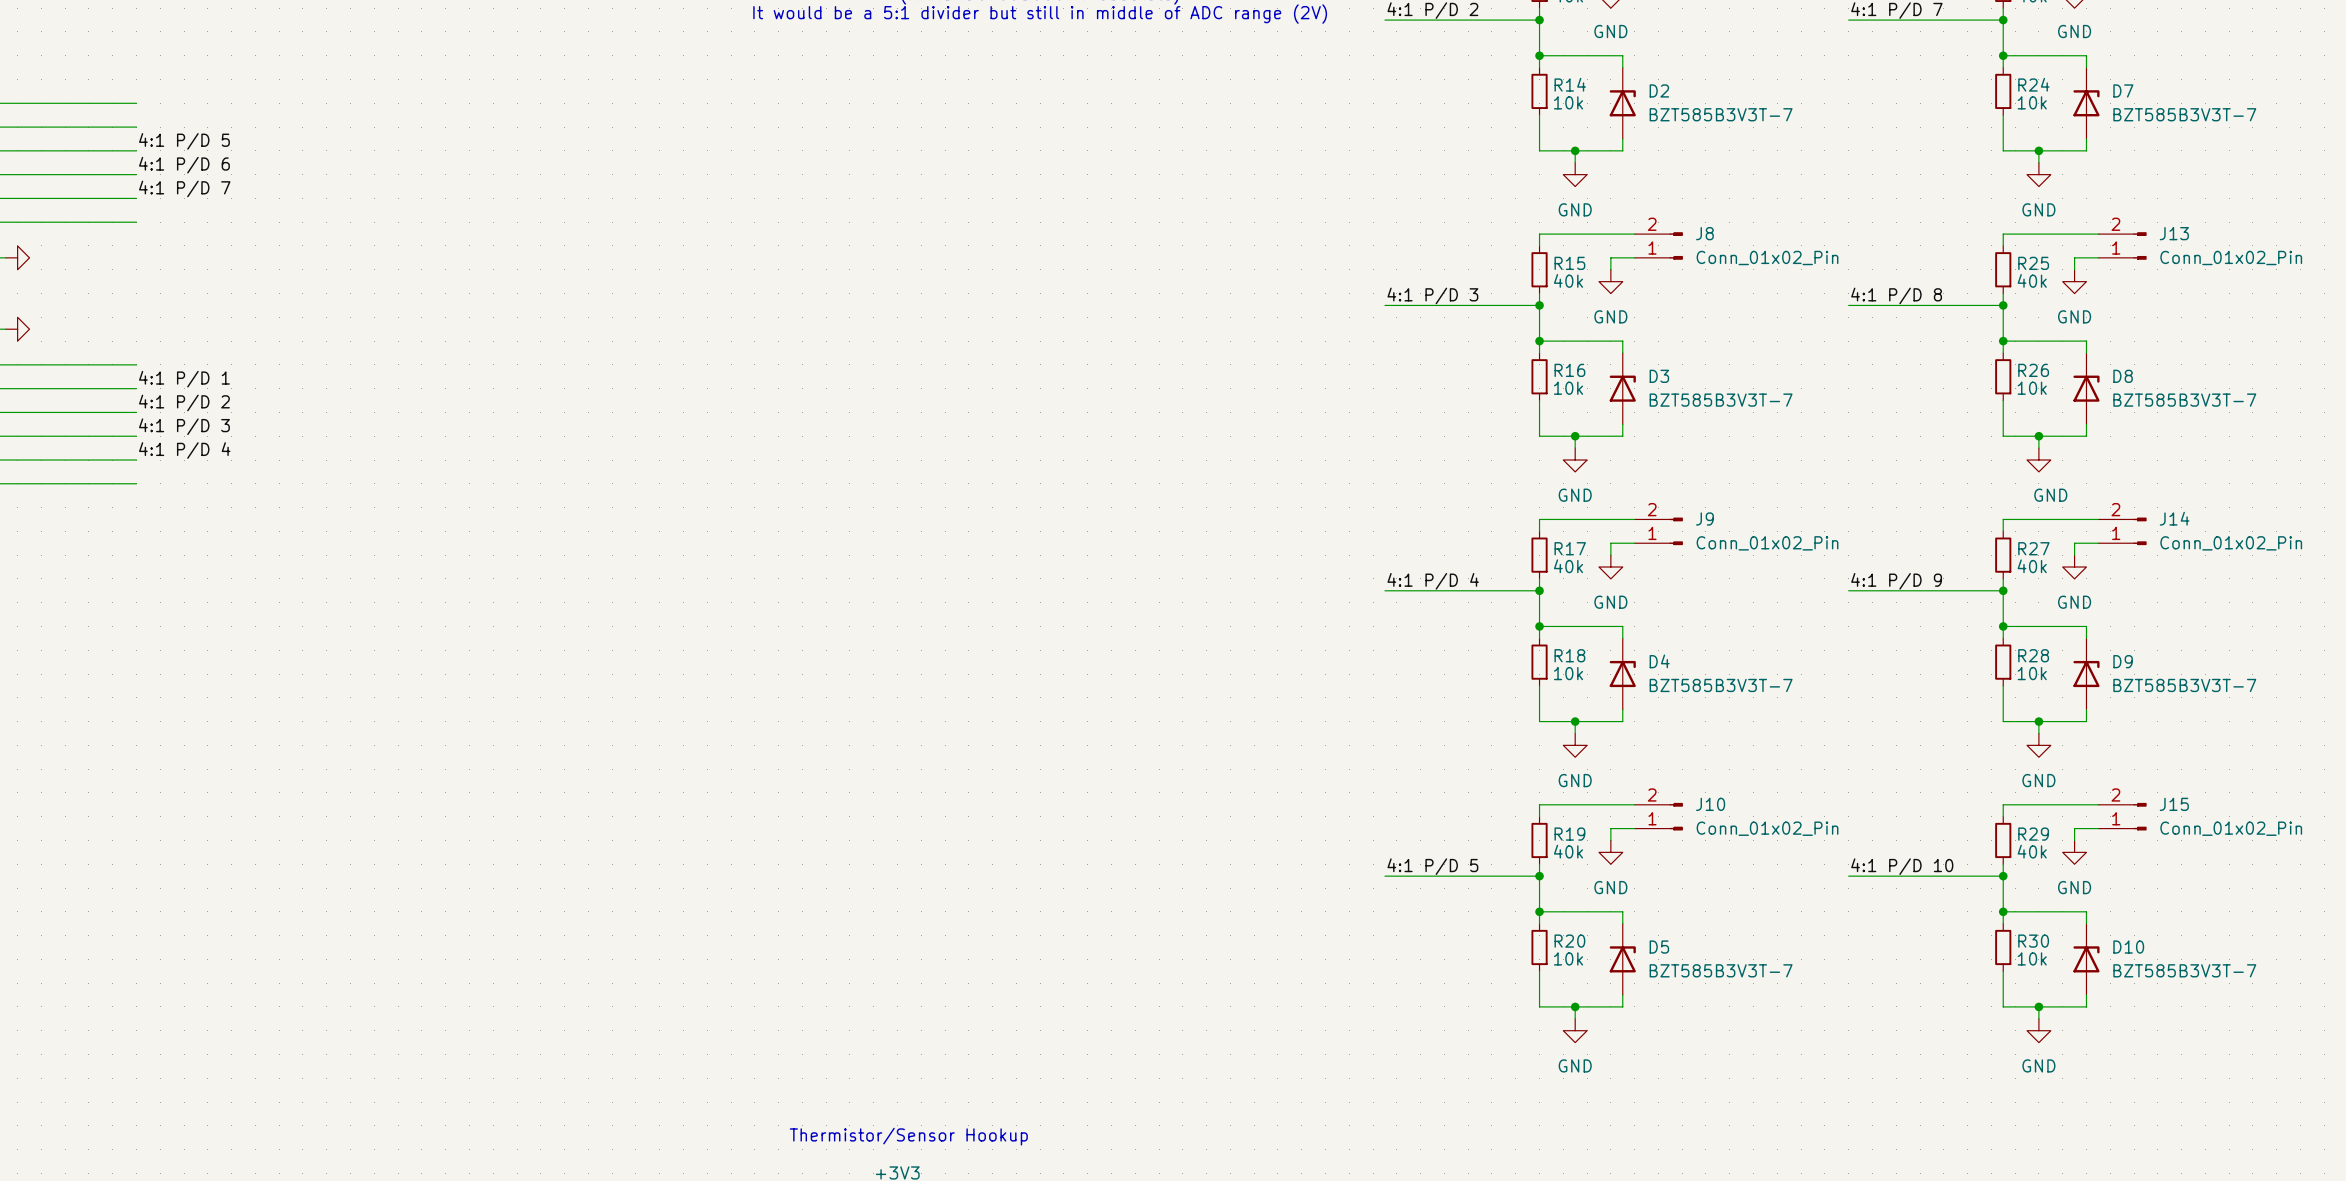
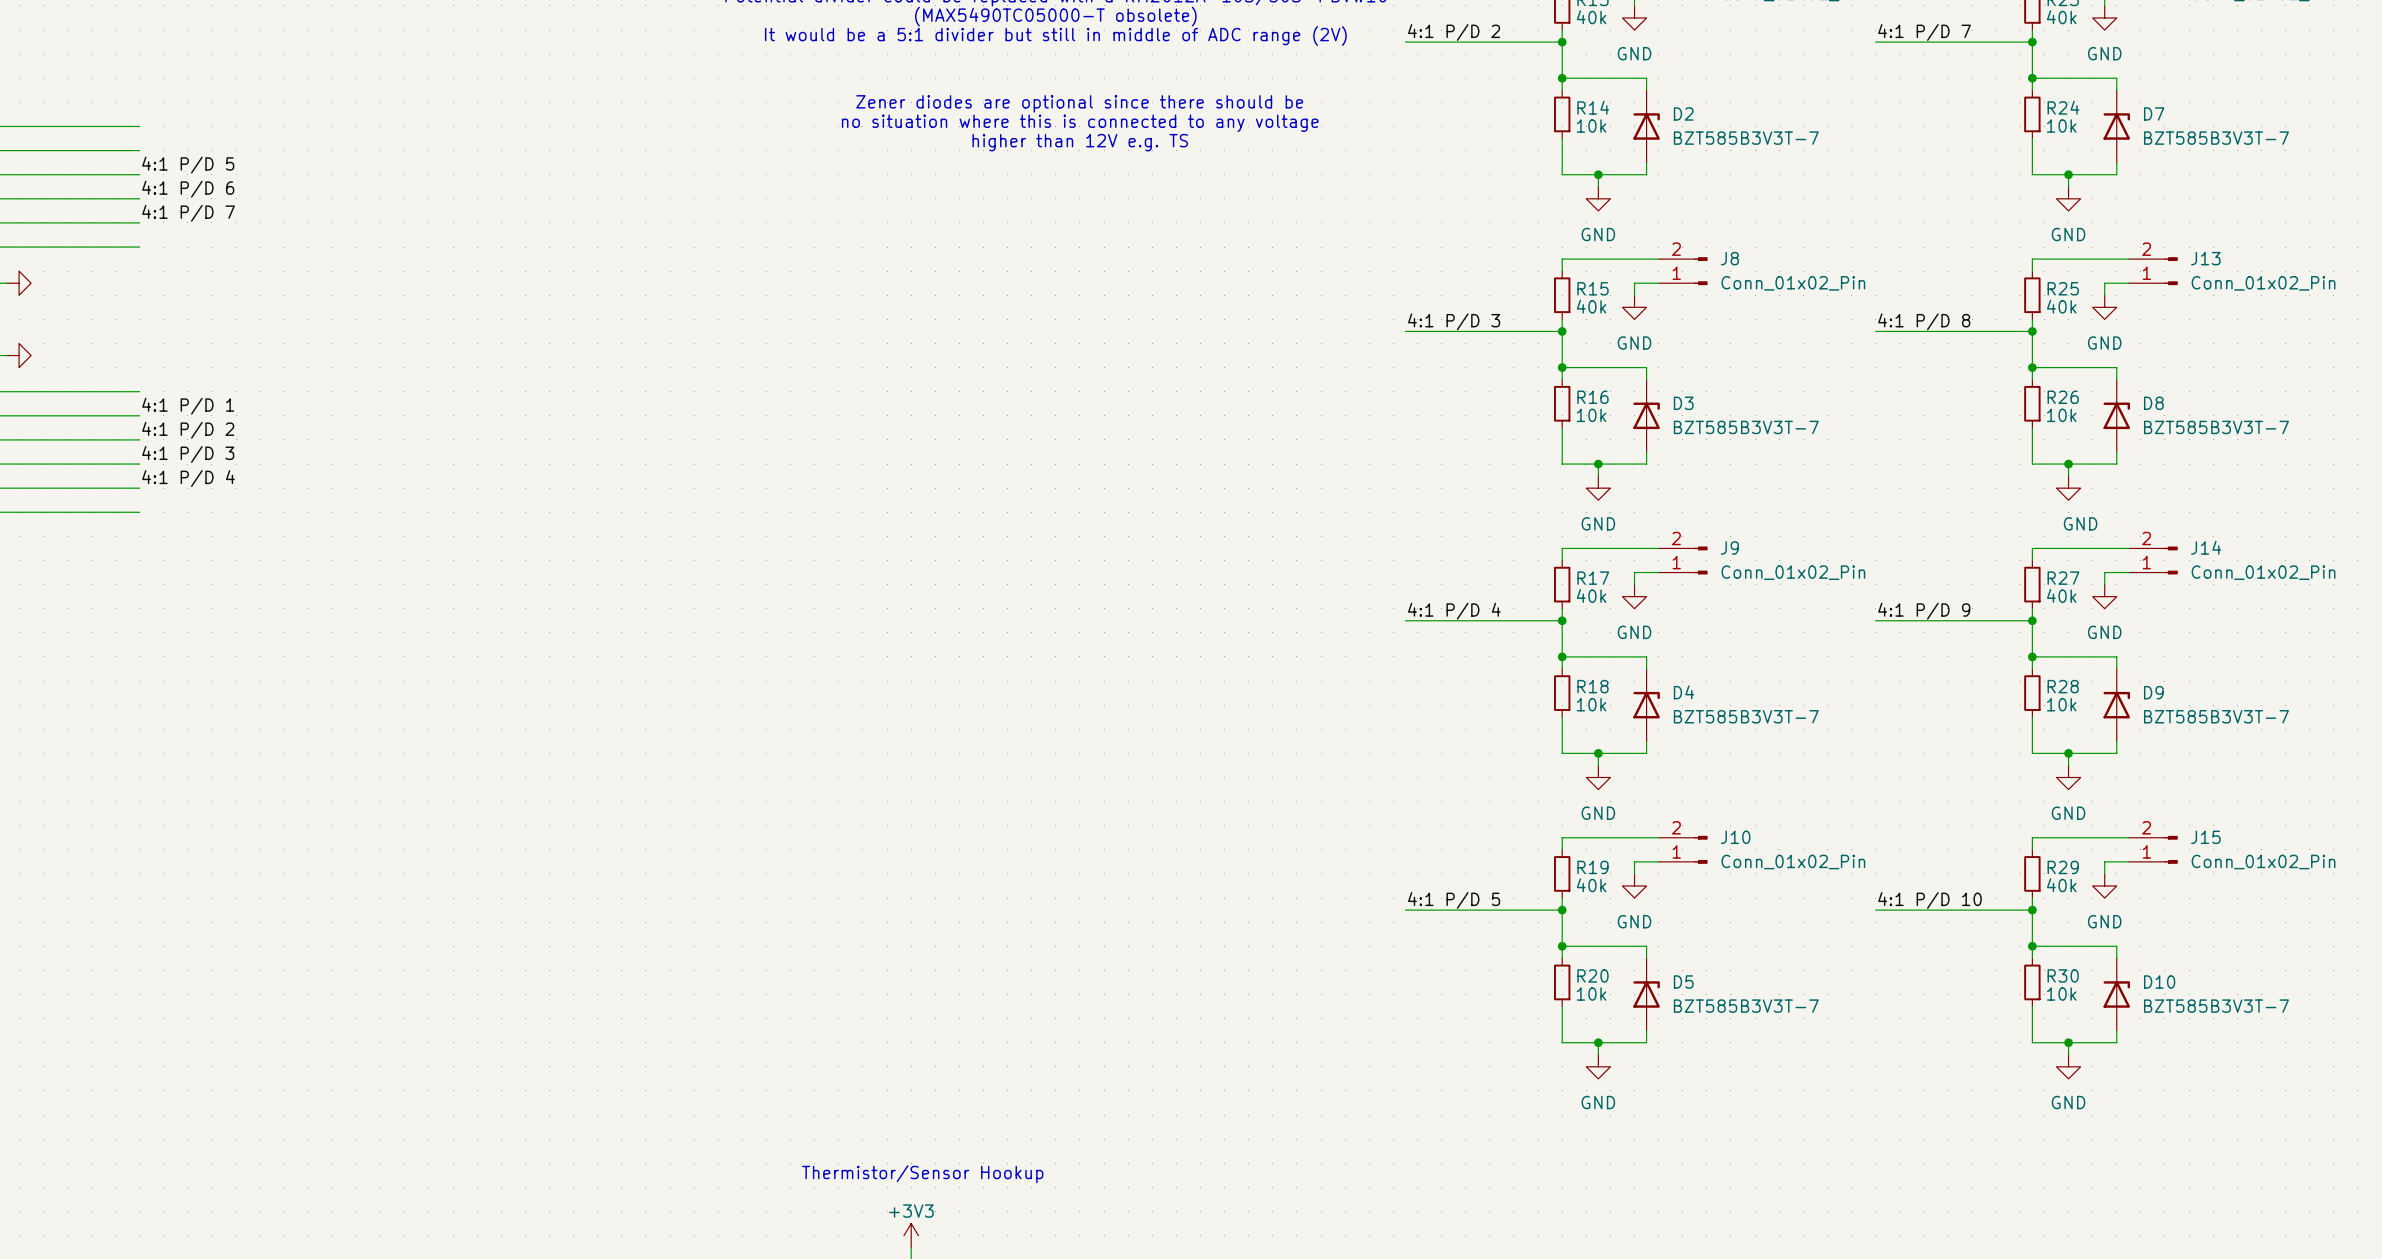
text: none -> Zener diodes are optional since there should be (1079, 103)
text: none -> no situation where this is connected to any voltage (1080, 123)
text: none -> higher than 12V e.g. TS (1080, 142)

